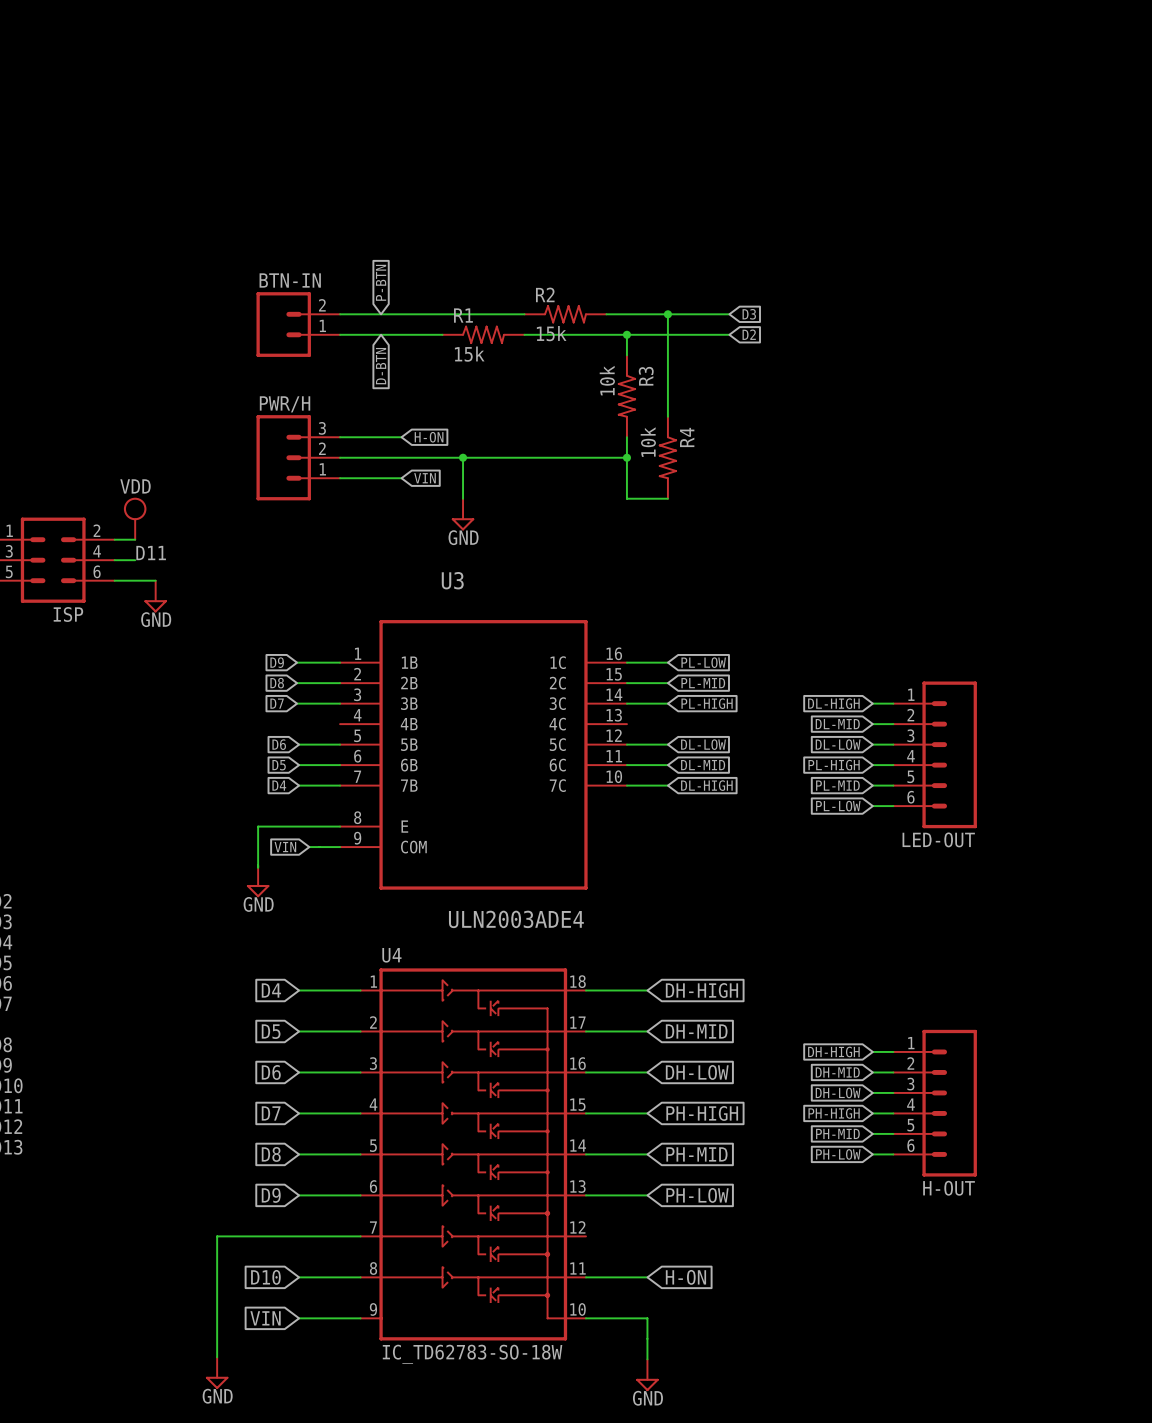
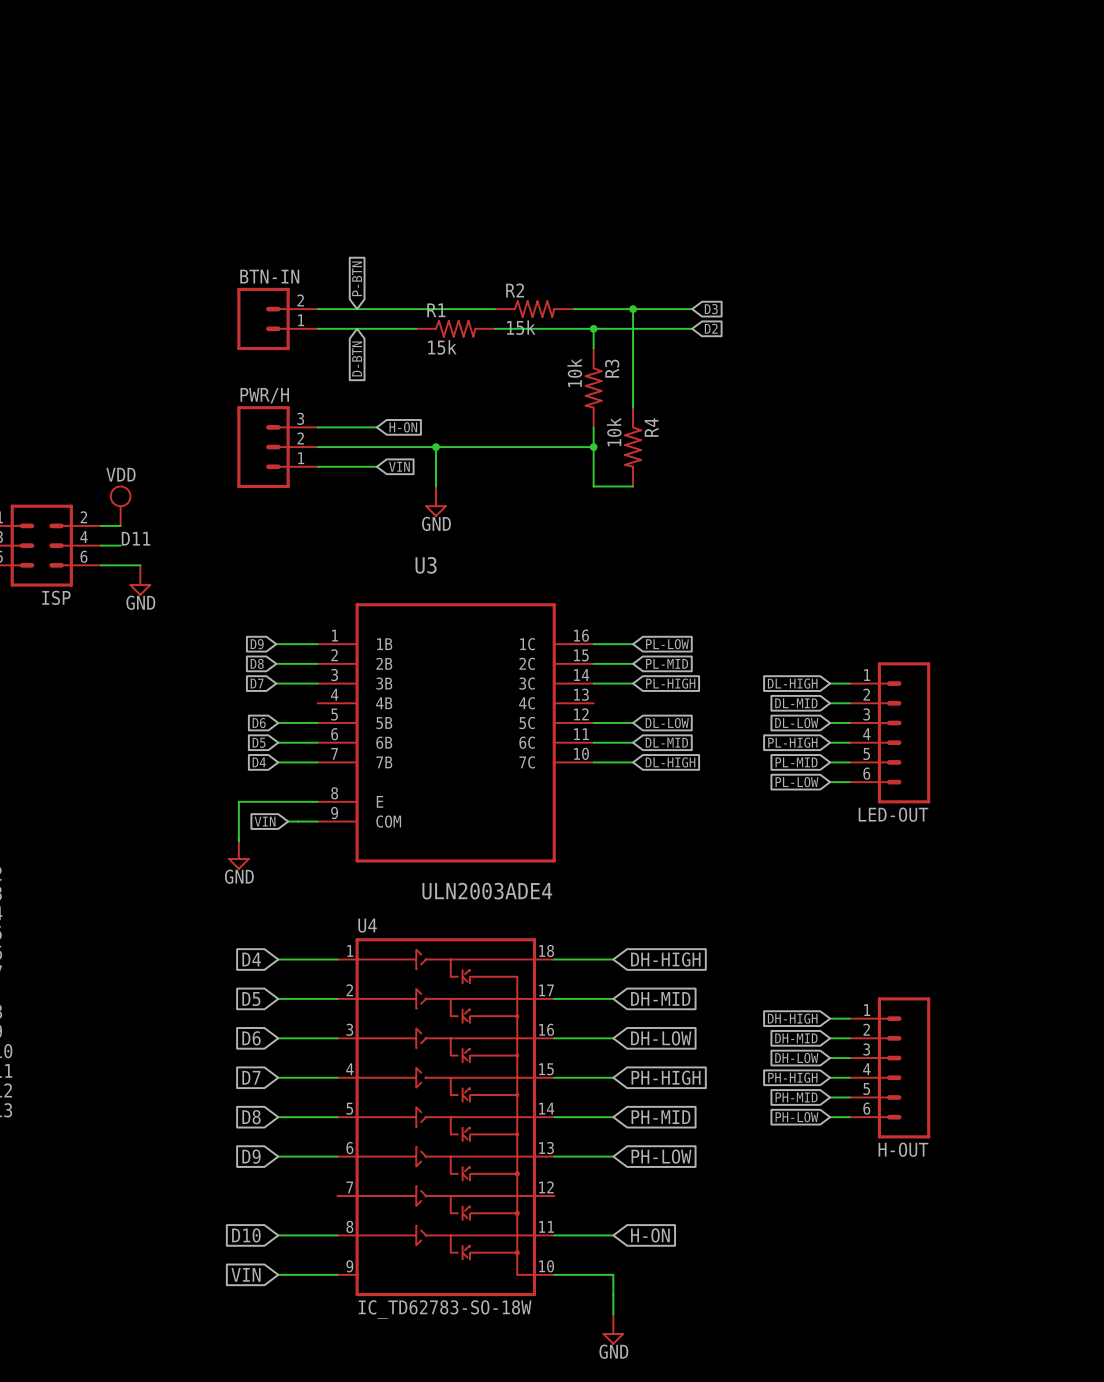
wire: (360, 1236) (217, 1236) (217, 1357) -> none
power symbol: GND (217, 1373) -> none

